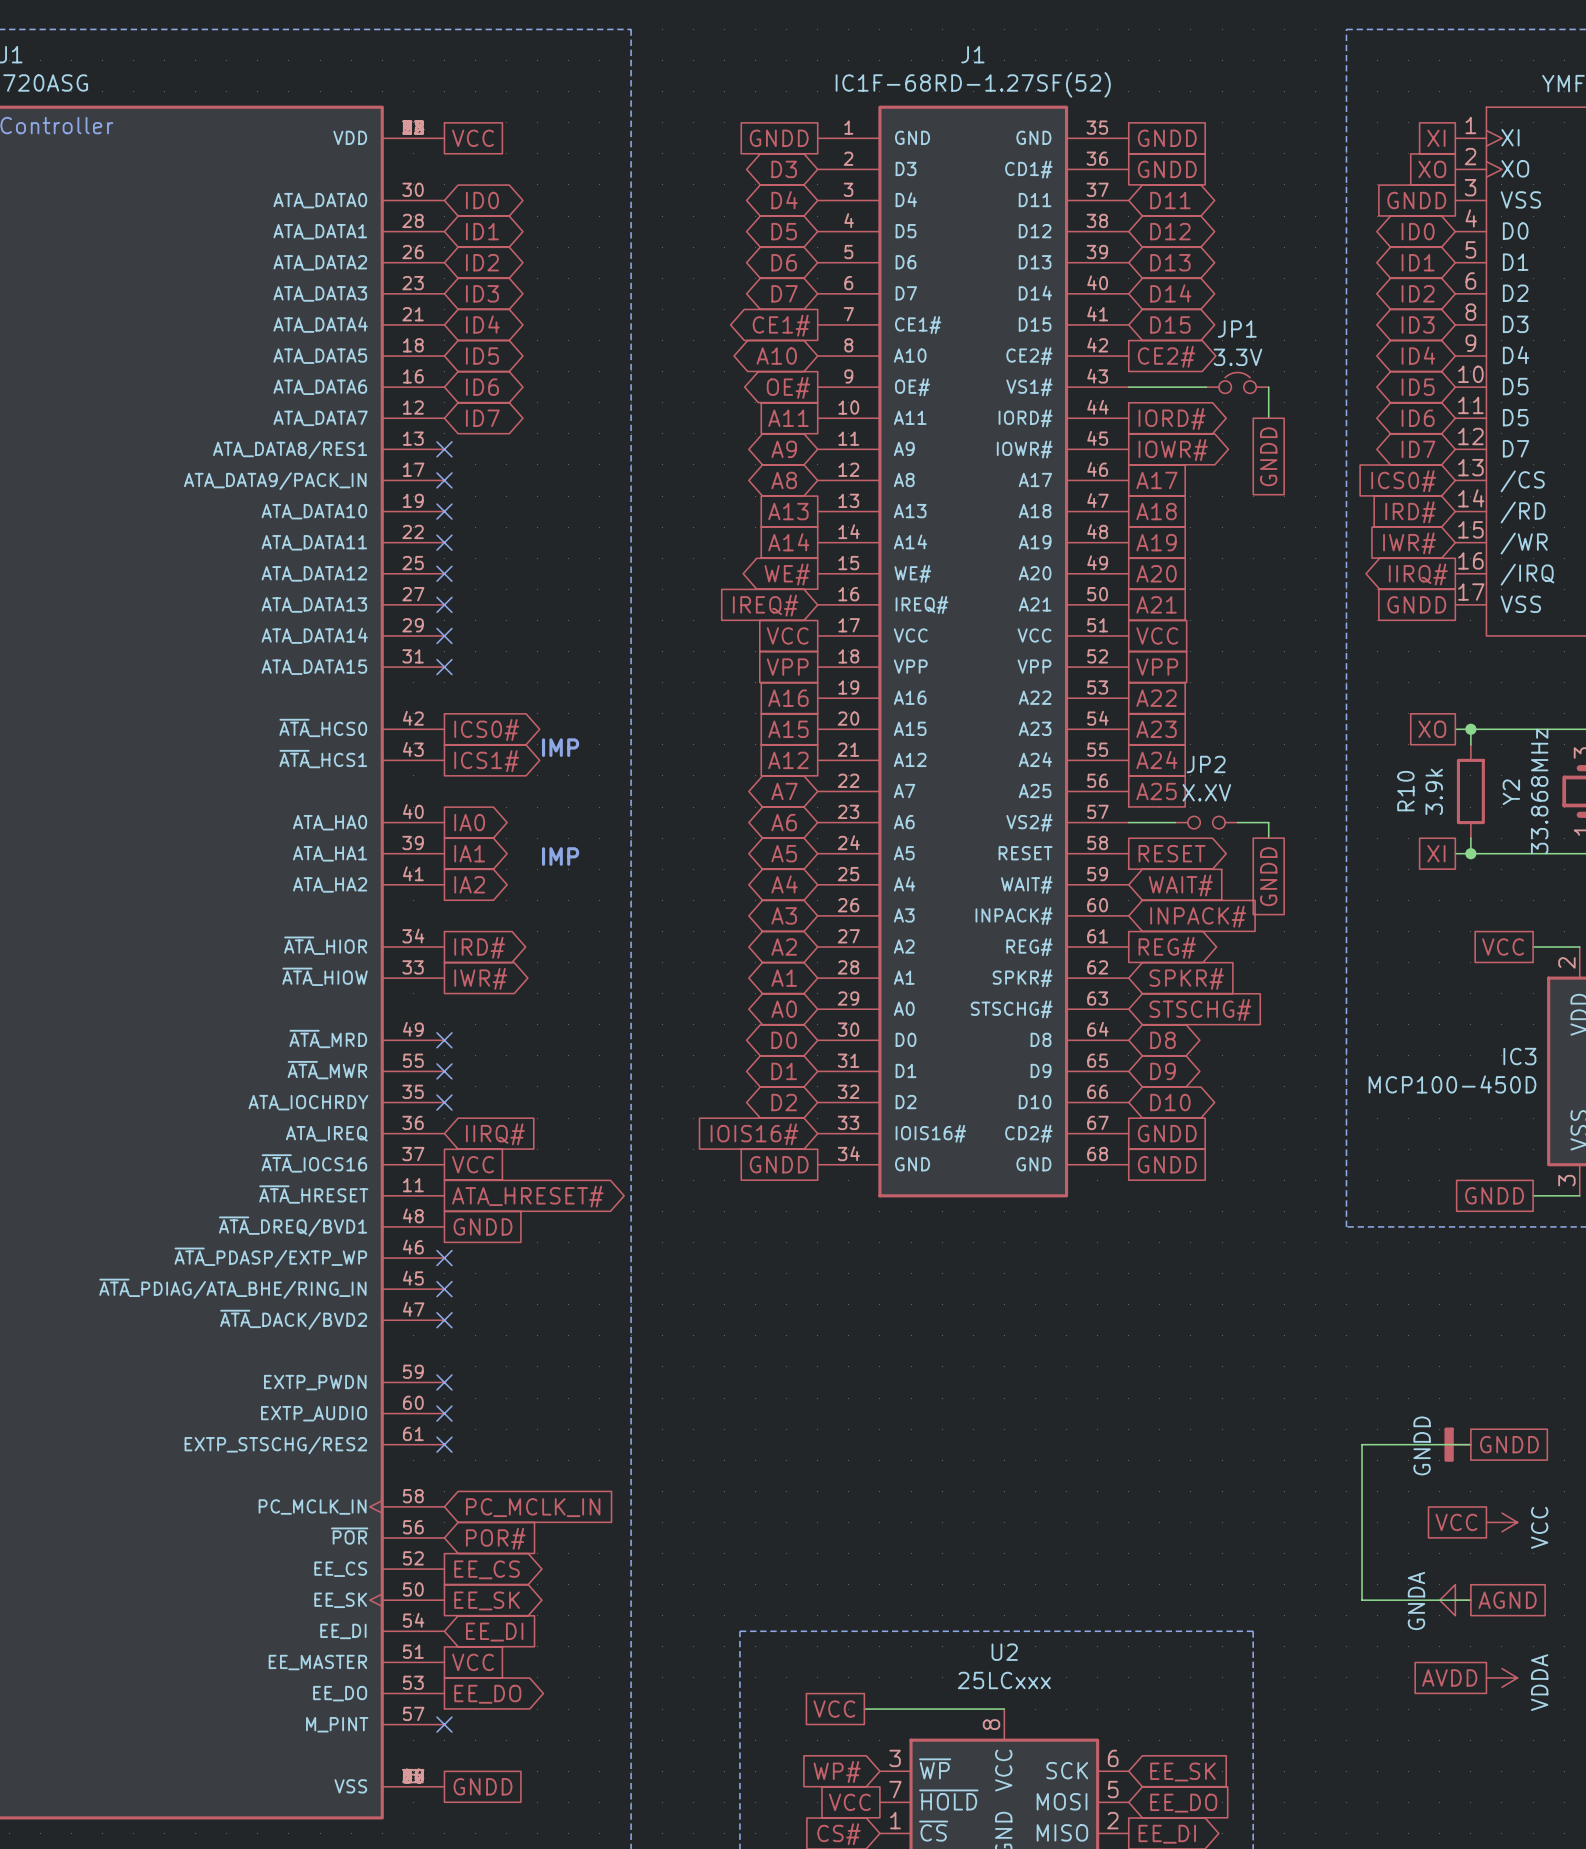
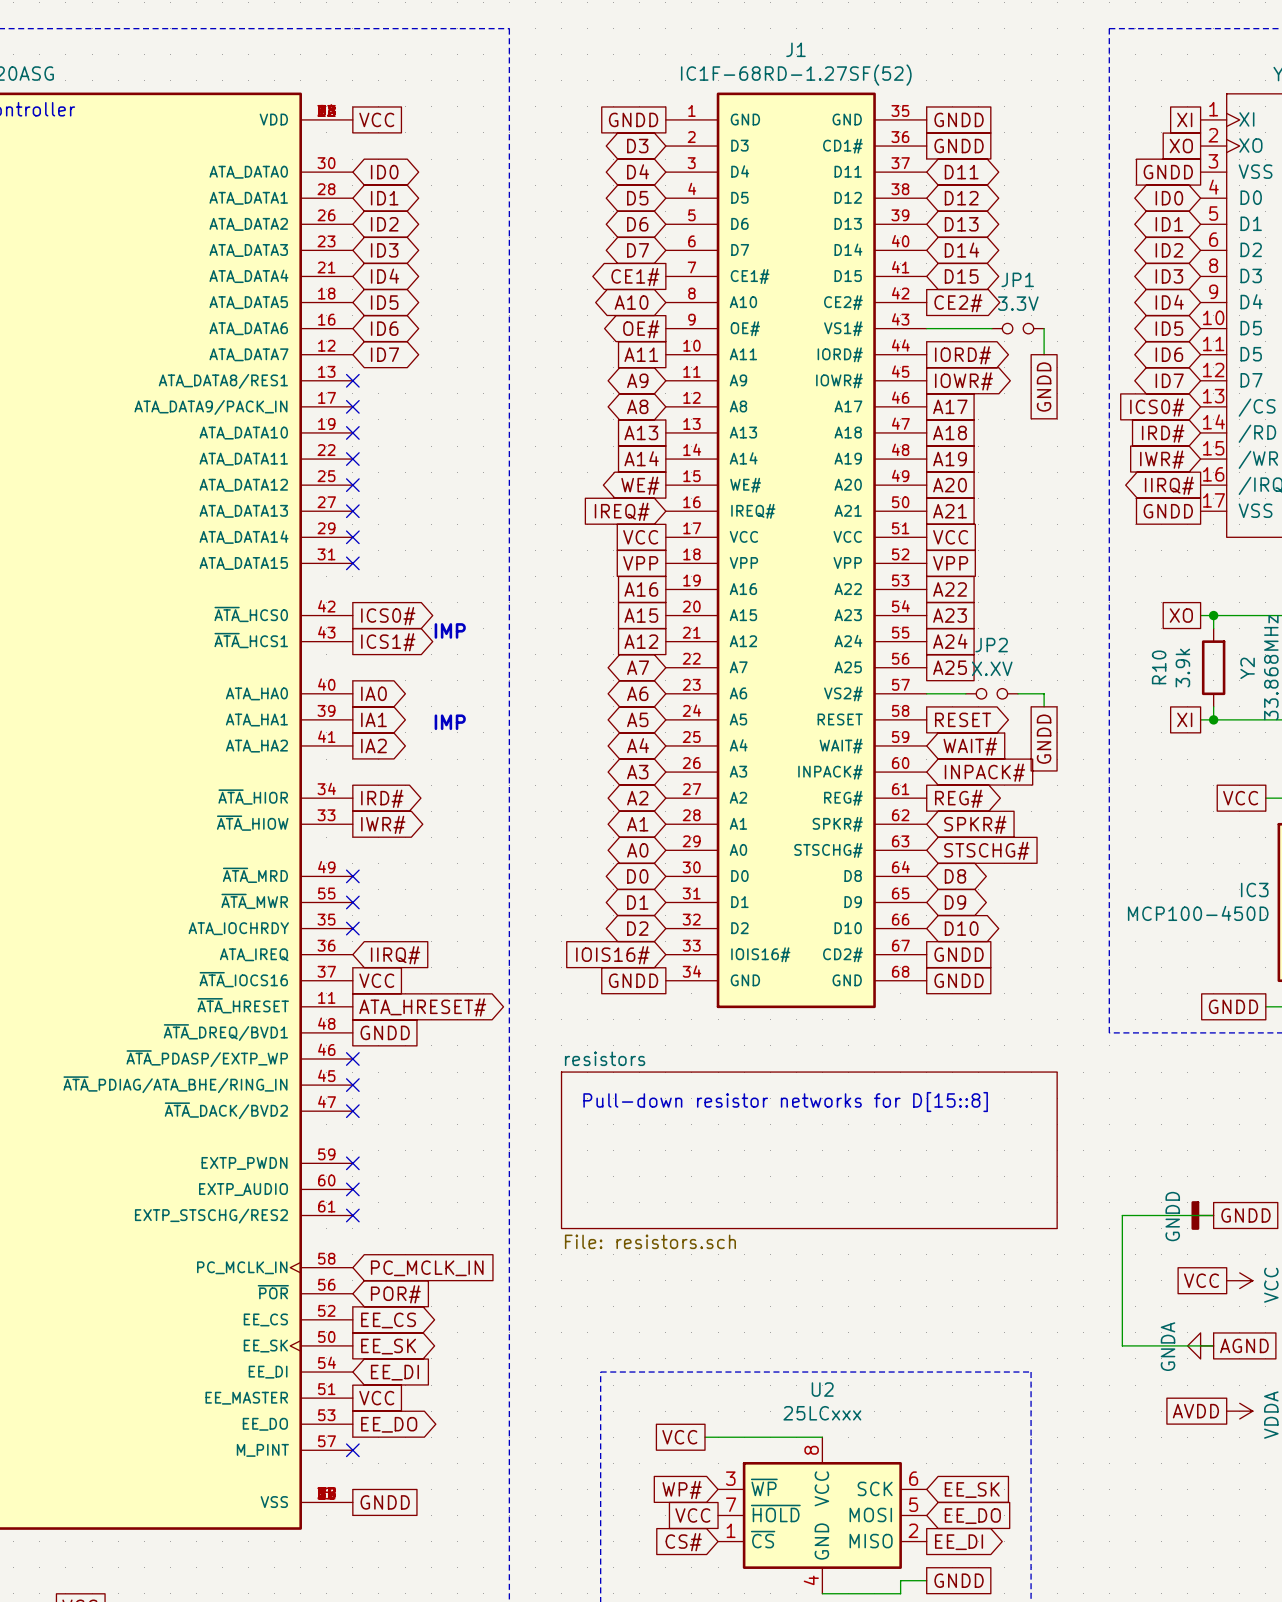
JP1 symbol: [1206, 372, 1269, 394] -> [991, 323, 1045, 334]
text: none -> Pull-down resistor networks for D[15::8] (785, 1102)
sheet resistors: none -> File: resistors.sch (809, 1150)

